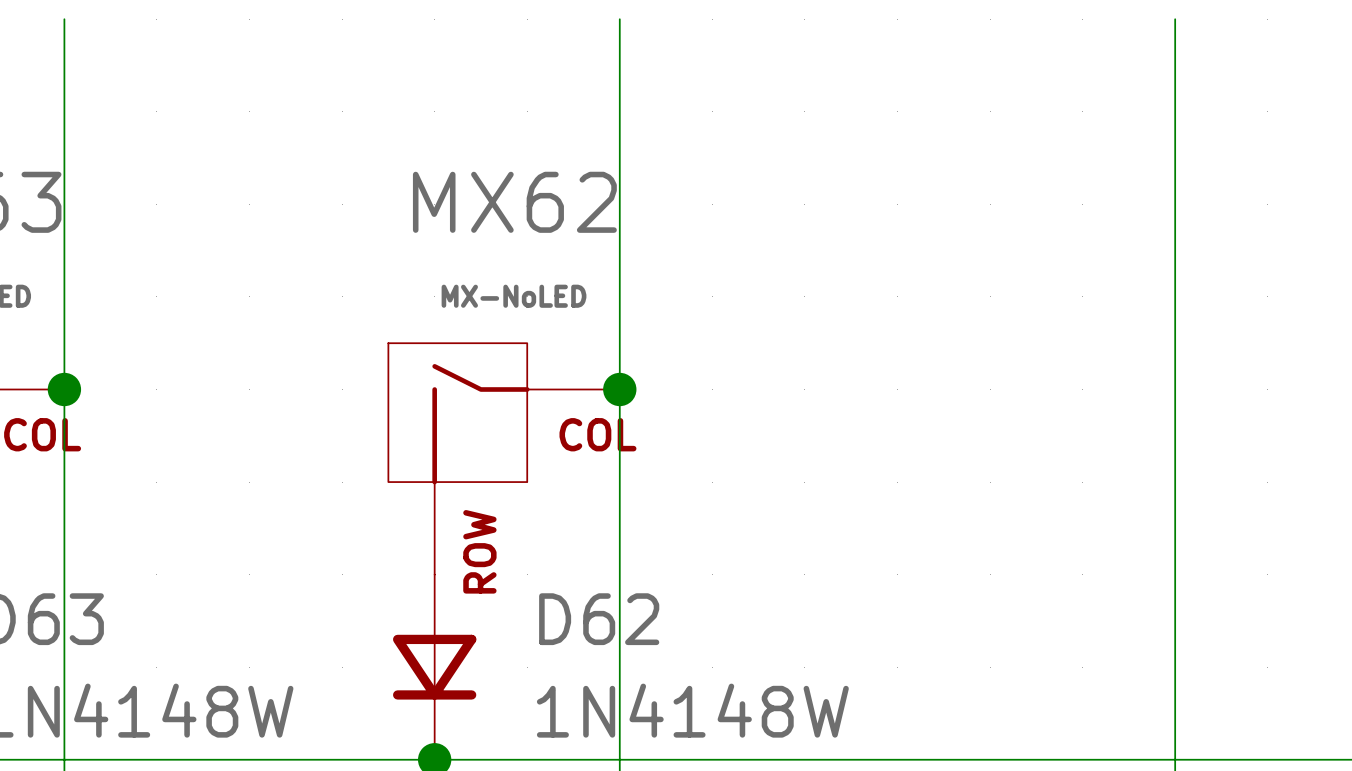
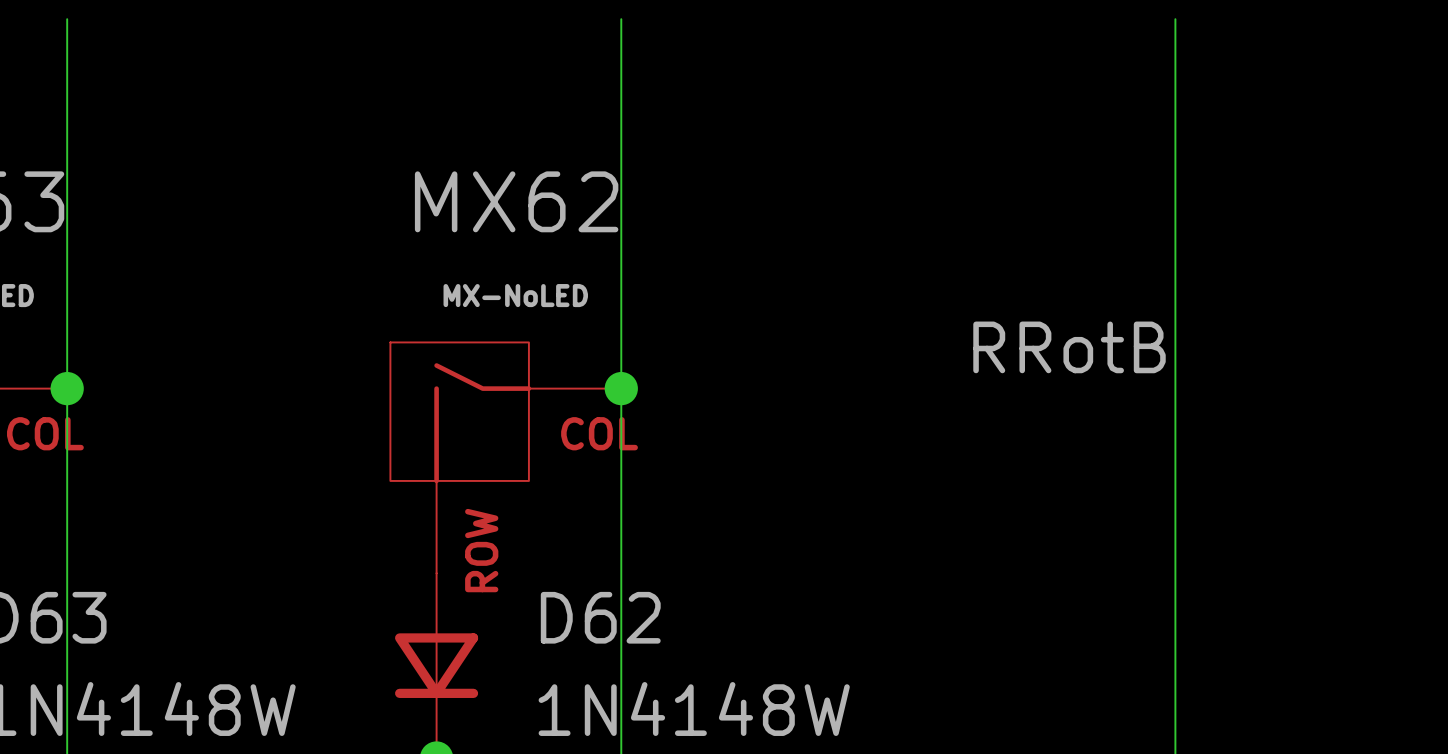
label: none -> RRotB (1069, 347)

